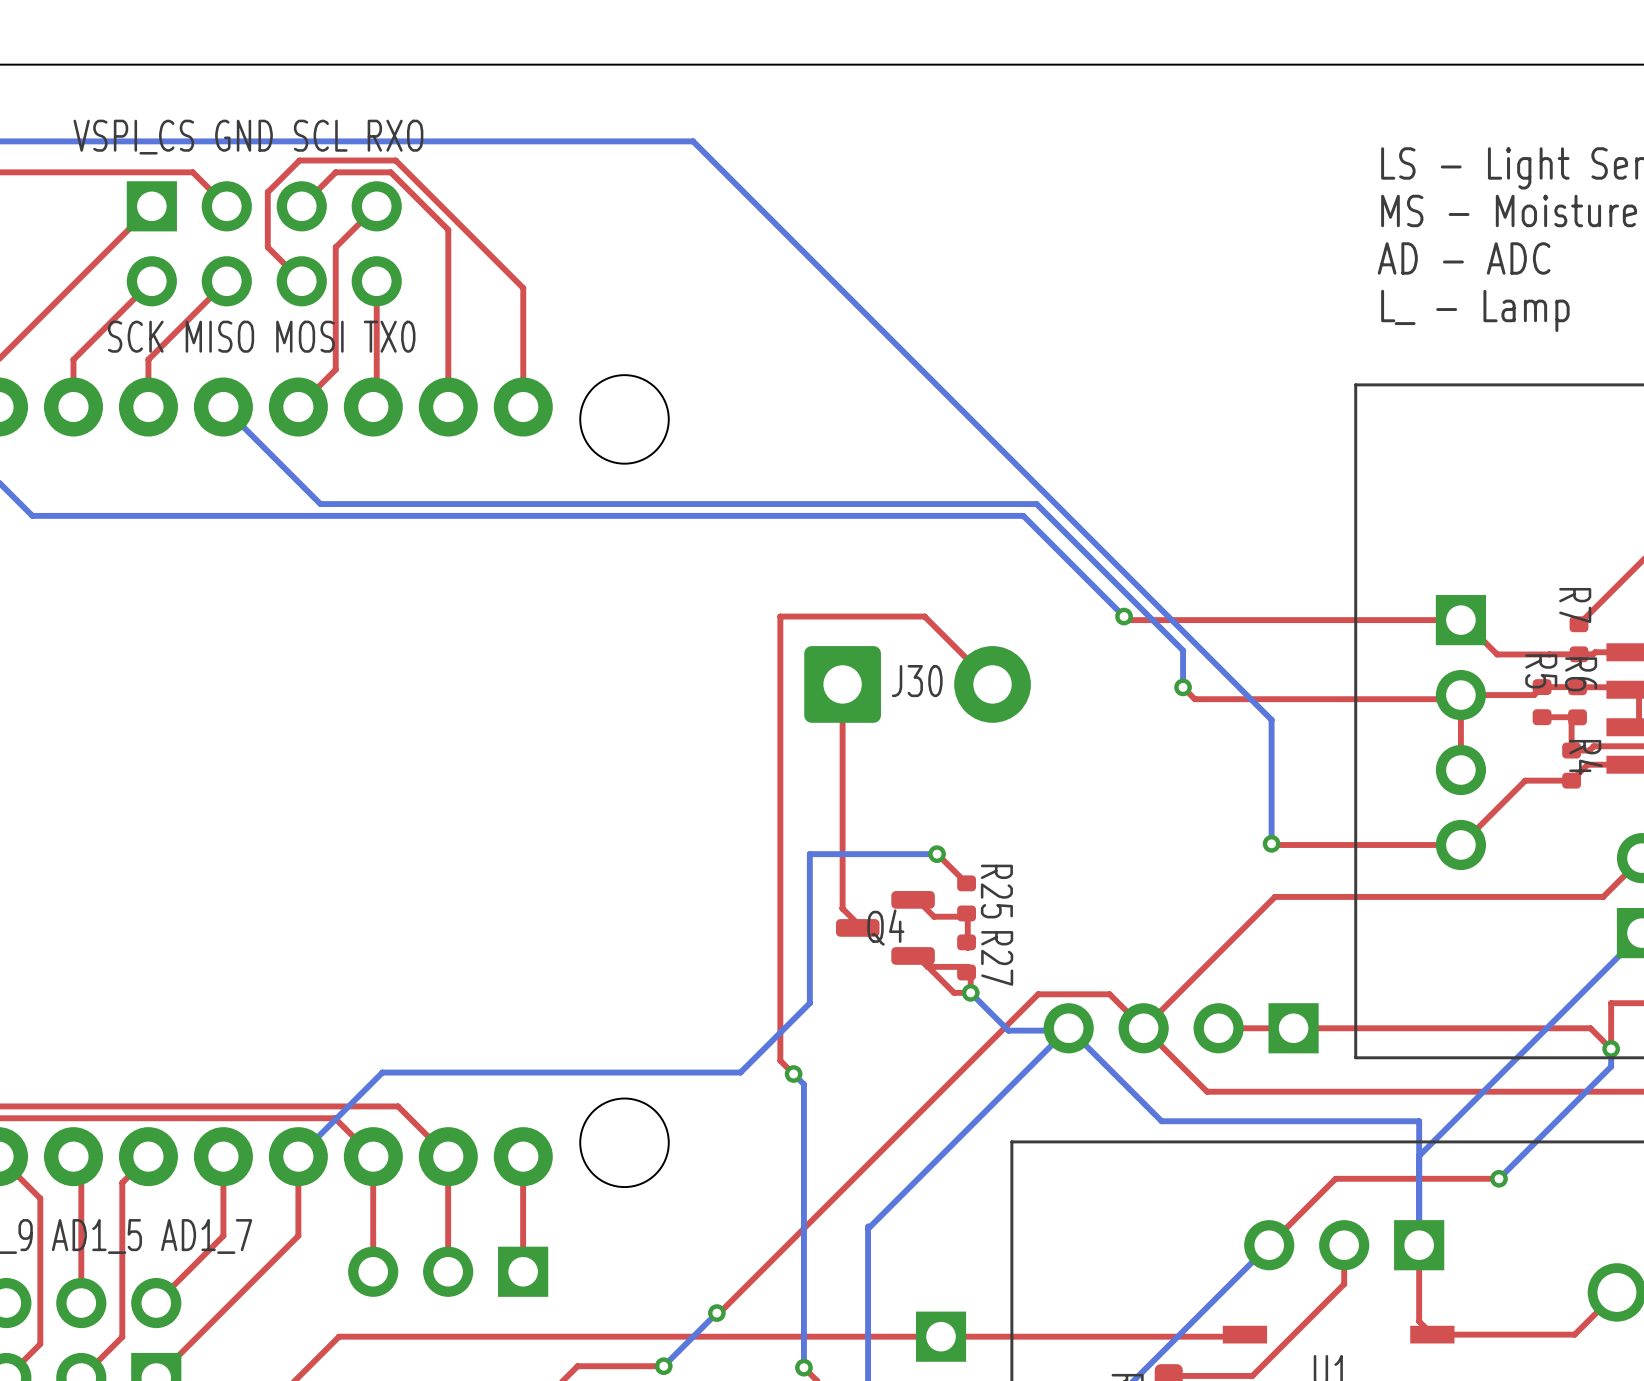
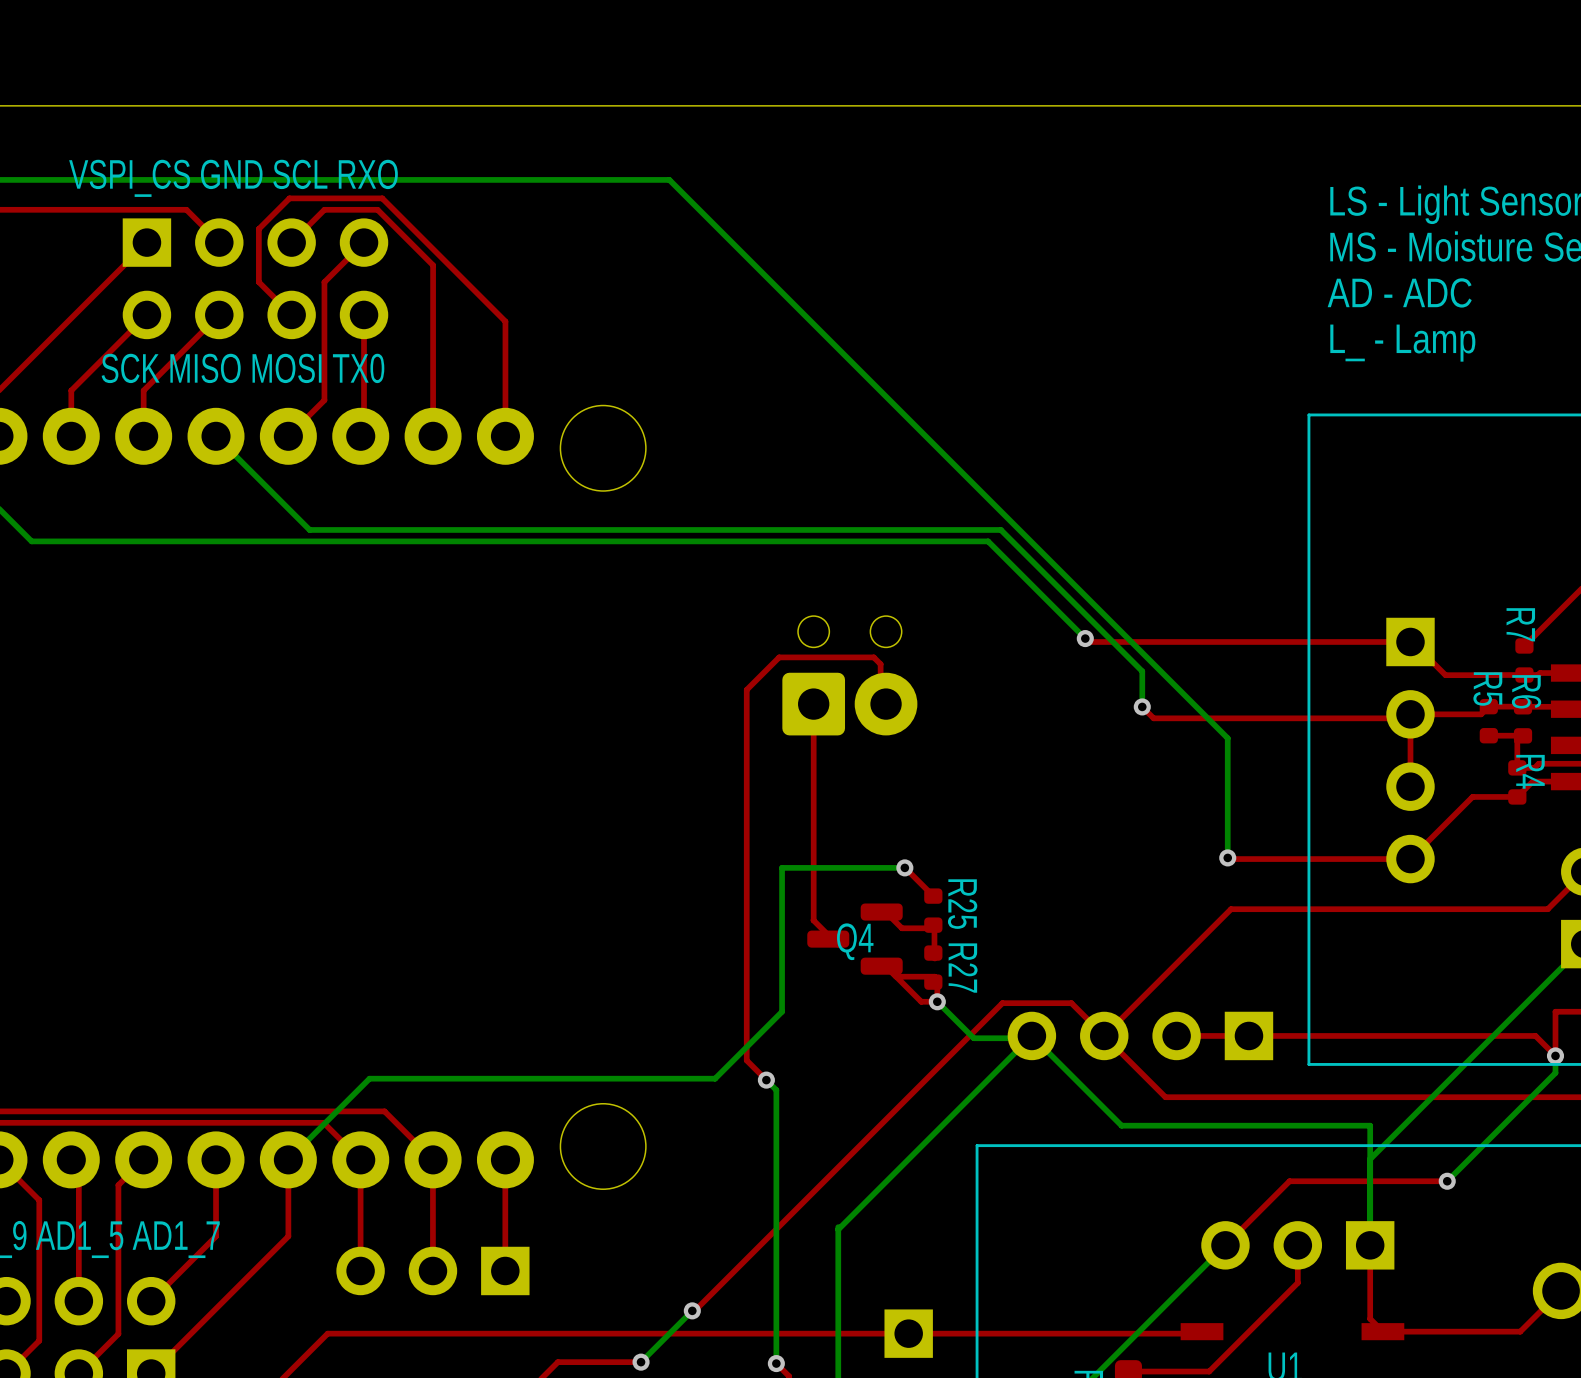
part: none -> (849, 675)
J30: (917, 684) -> none
top track: (992, 684) (924, 616) (780, 616) (780, 1060) -> (886, 704) (880, 698) (880, 664) (873, 657) (779, 657) (746, 689) (746, 1060) (753, 1067)

